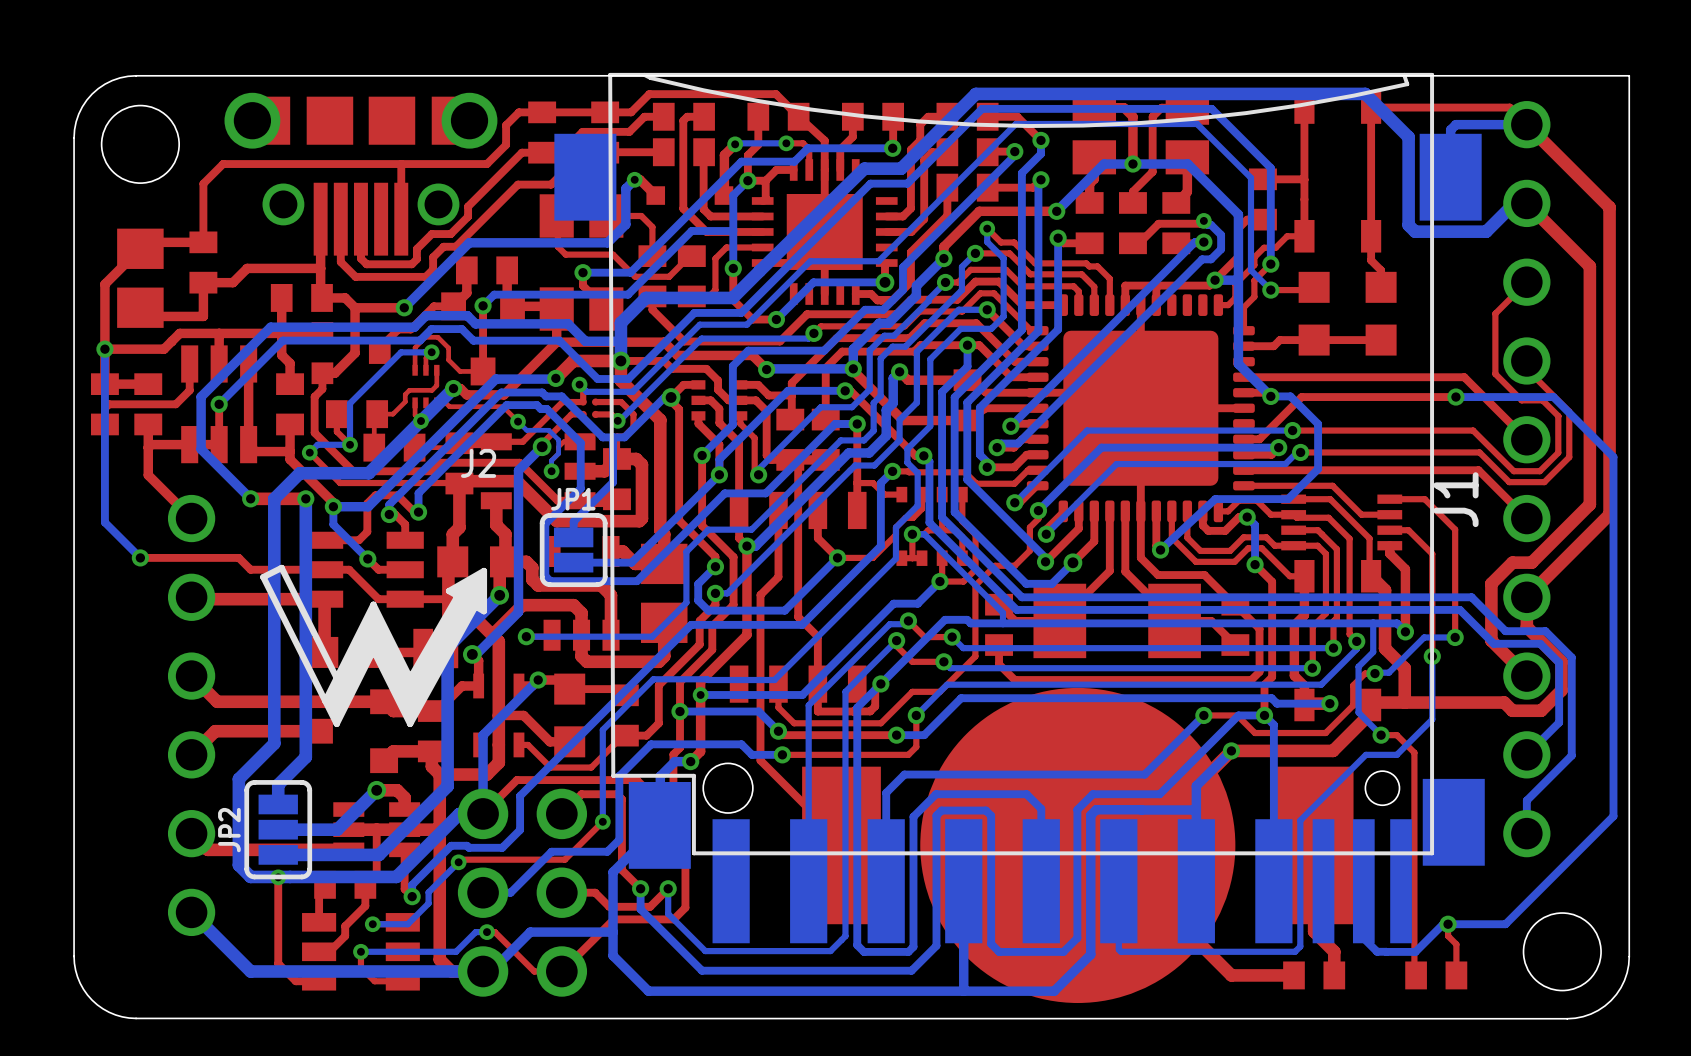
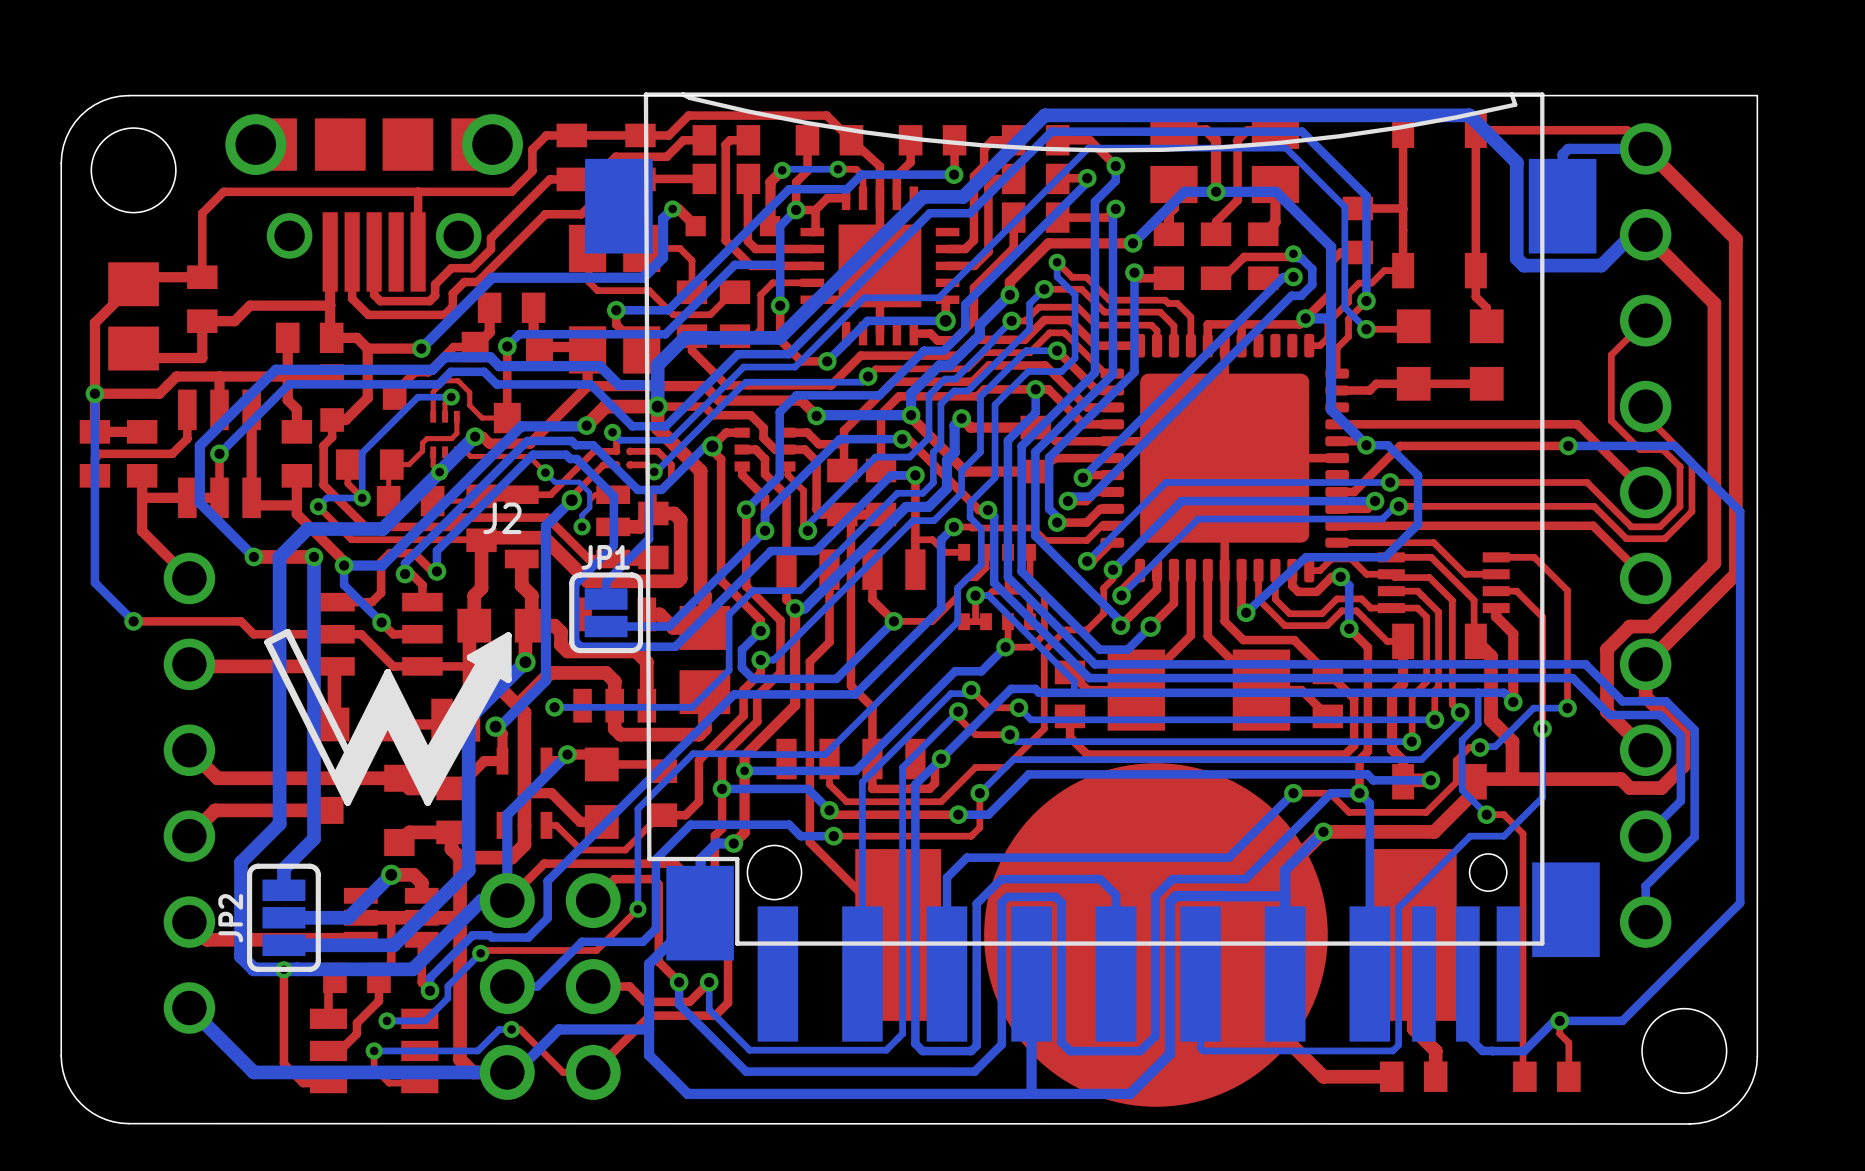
J1 name: J1 (1455, 499) -> none

